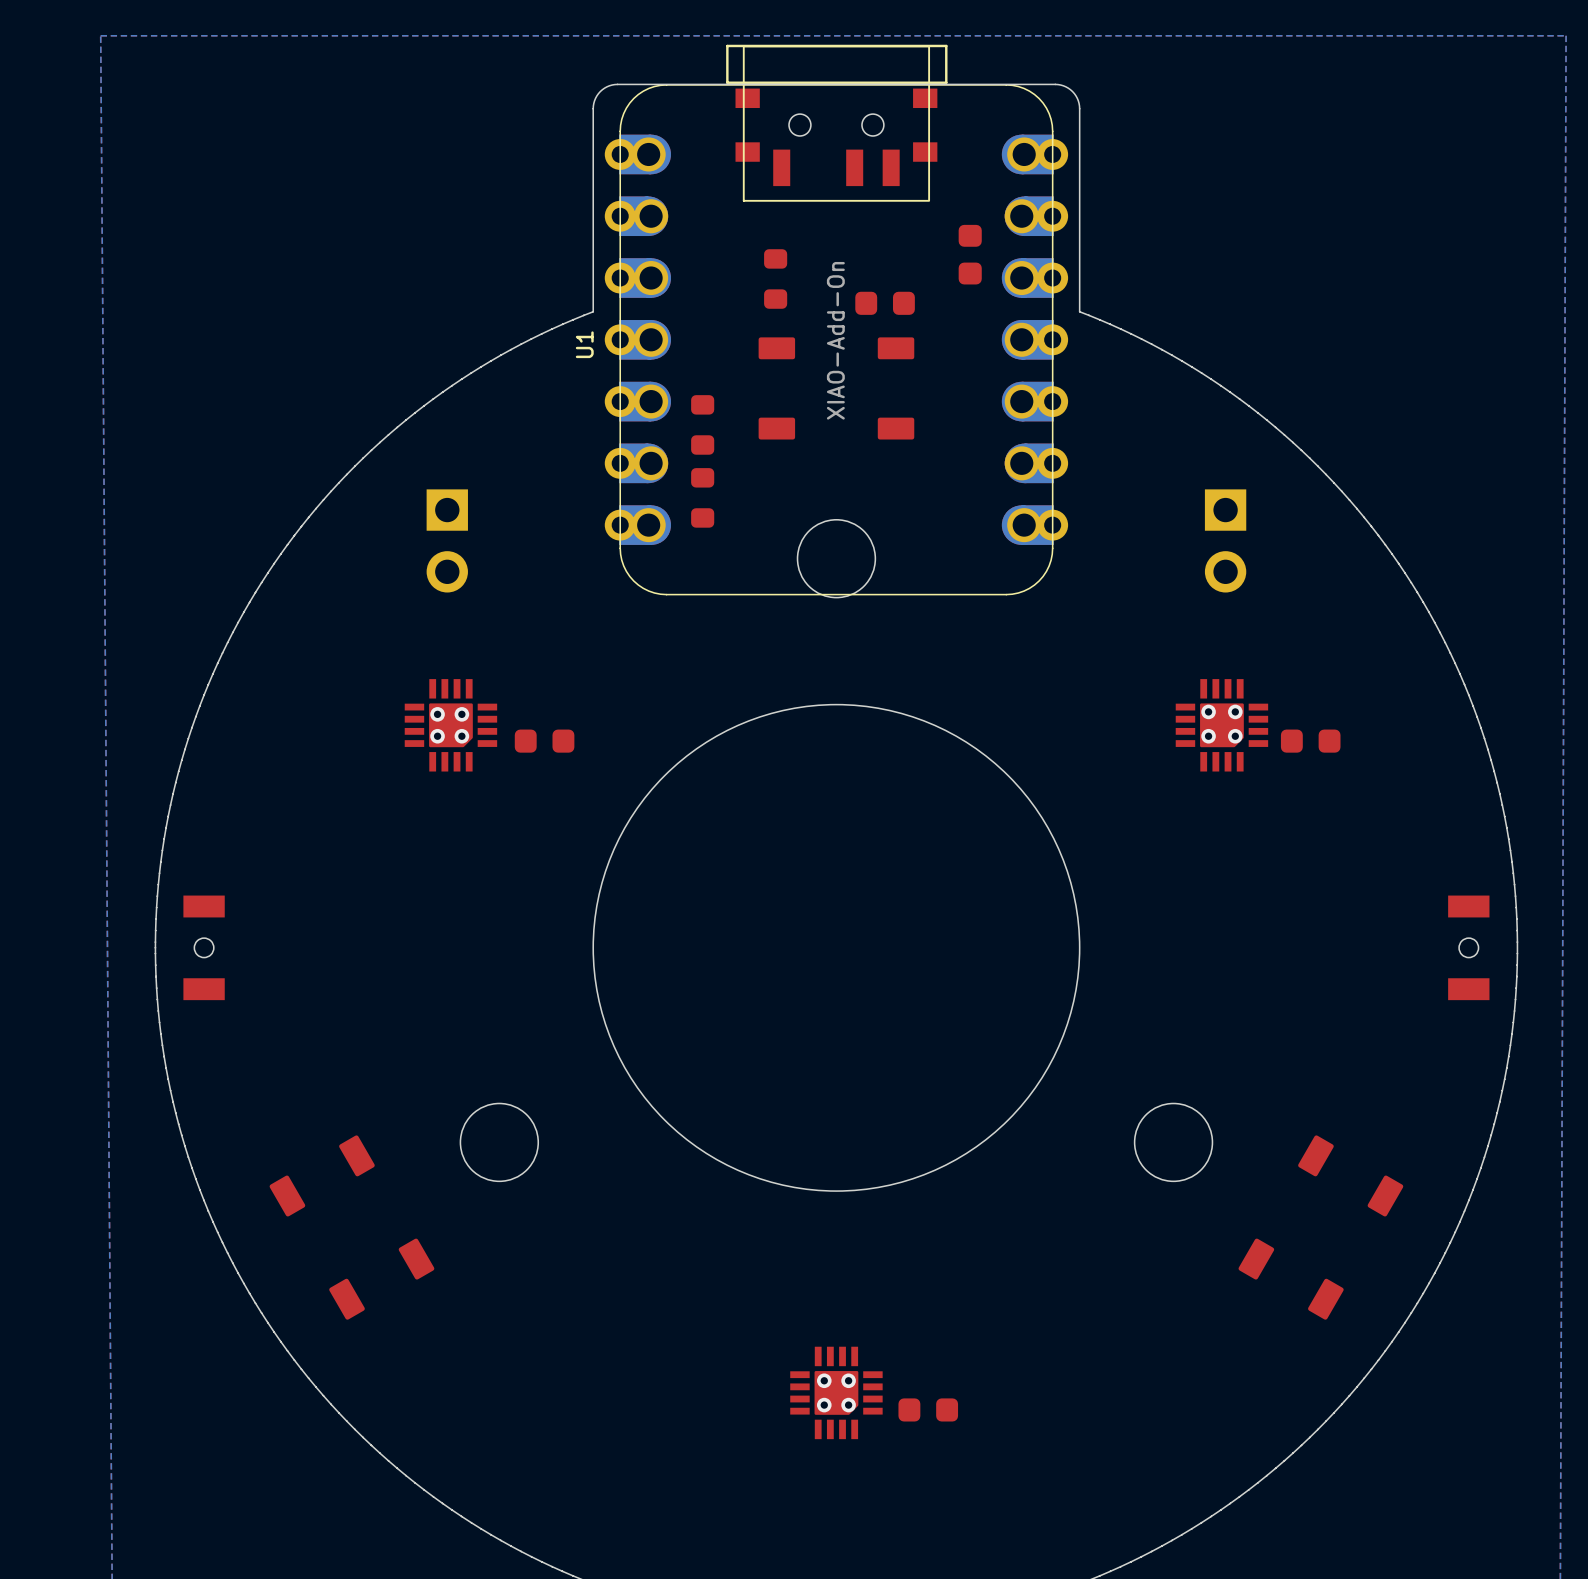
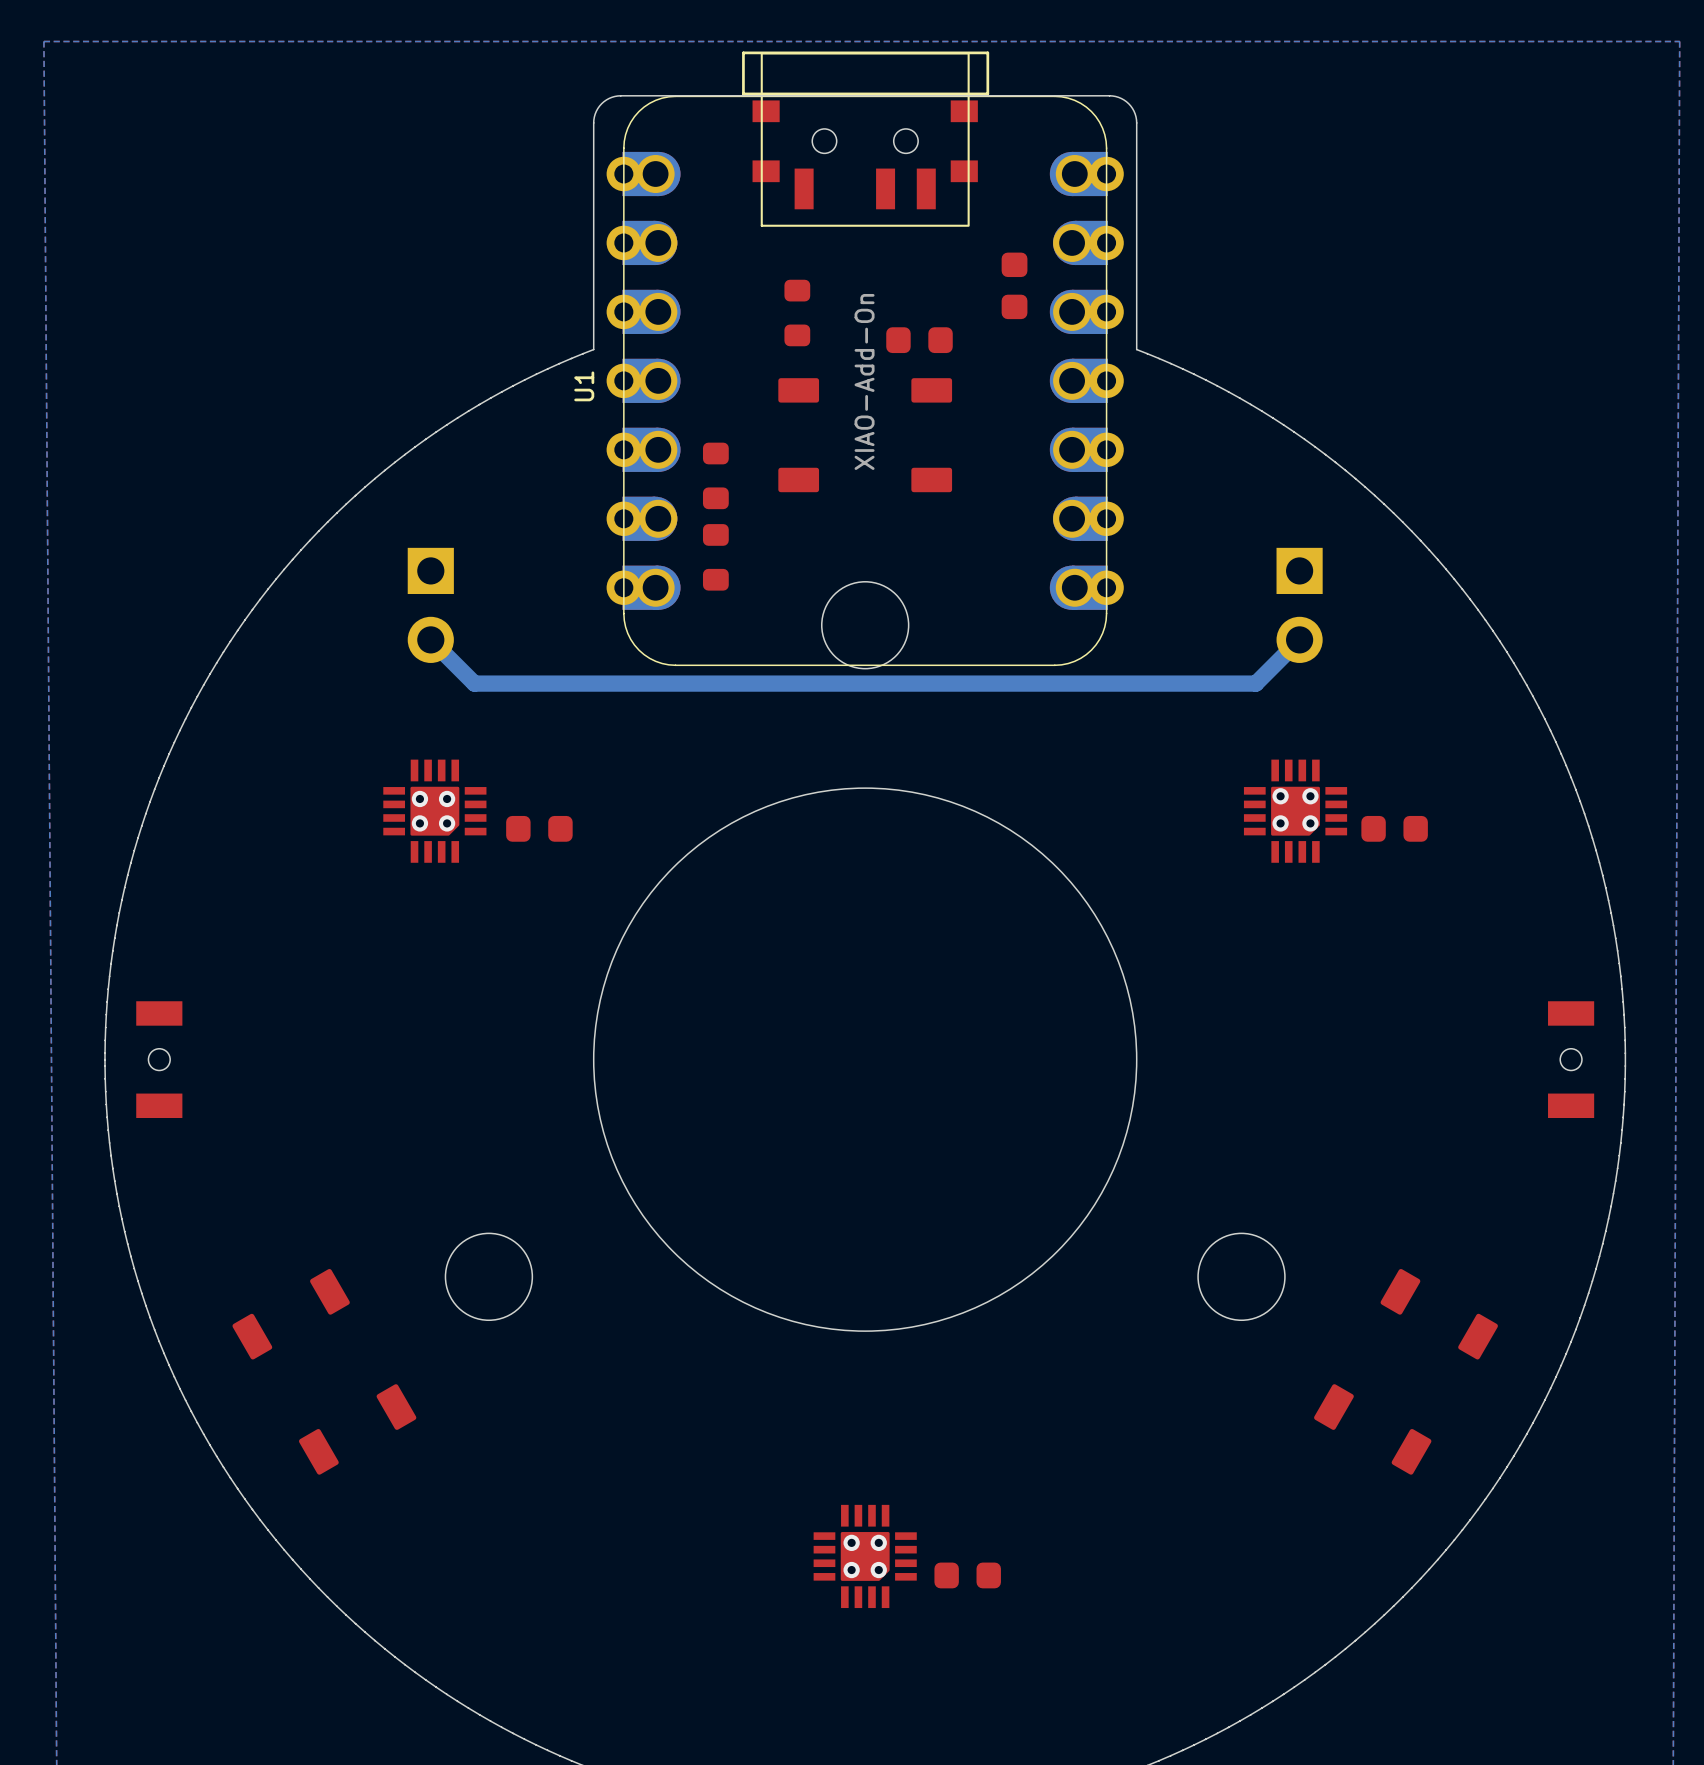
bottom track: none -> (1299, 639) (1255, 683) (474, 683) (430, 639)

